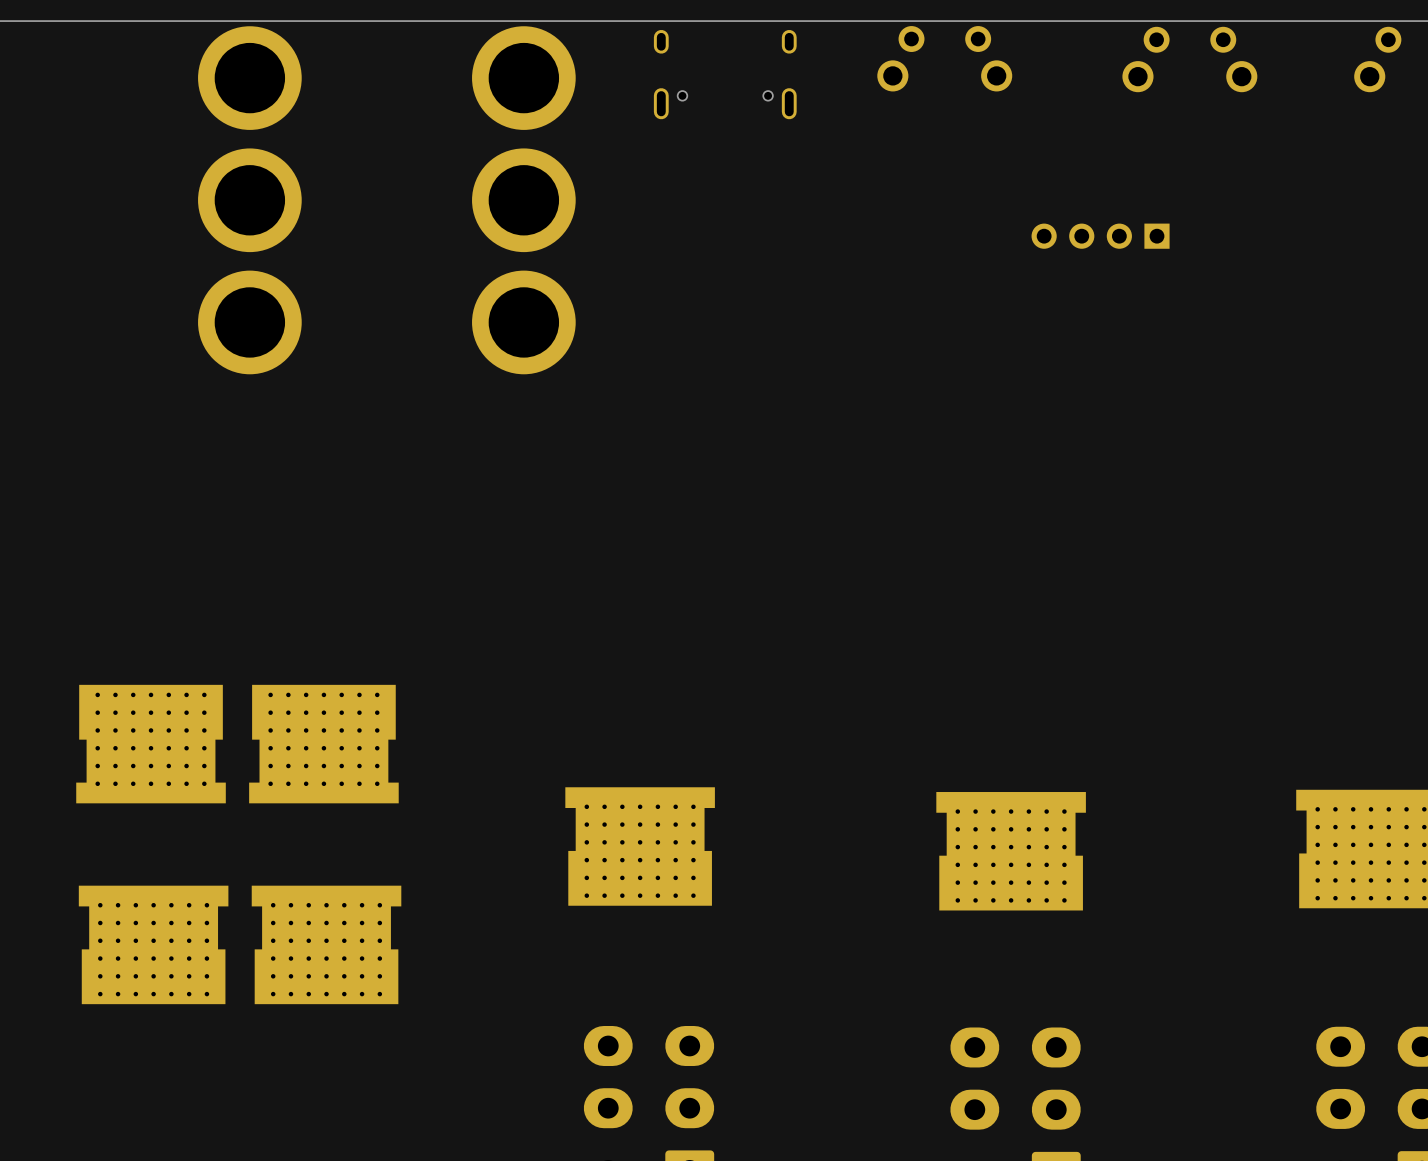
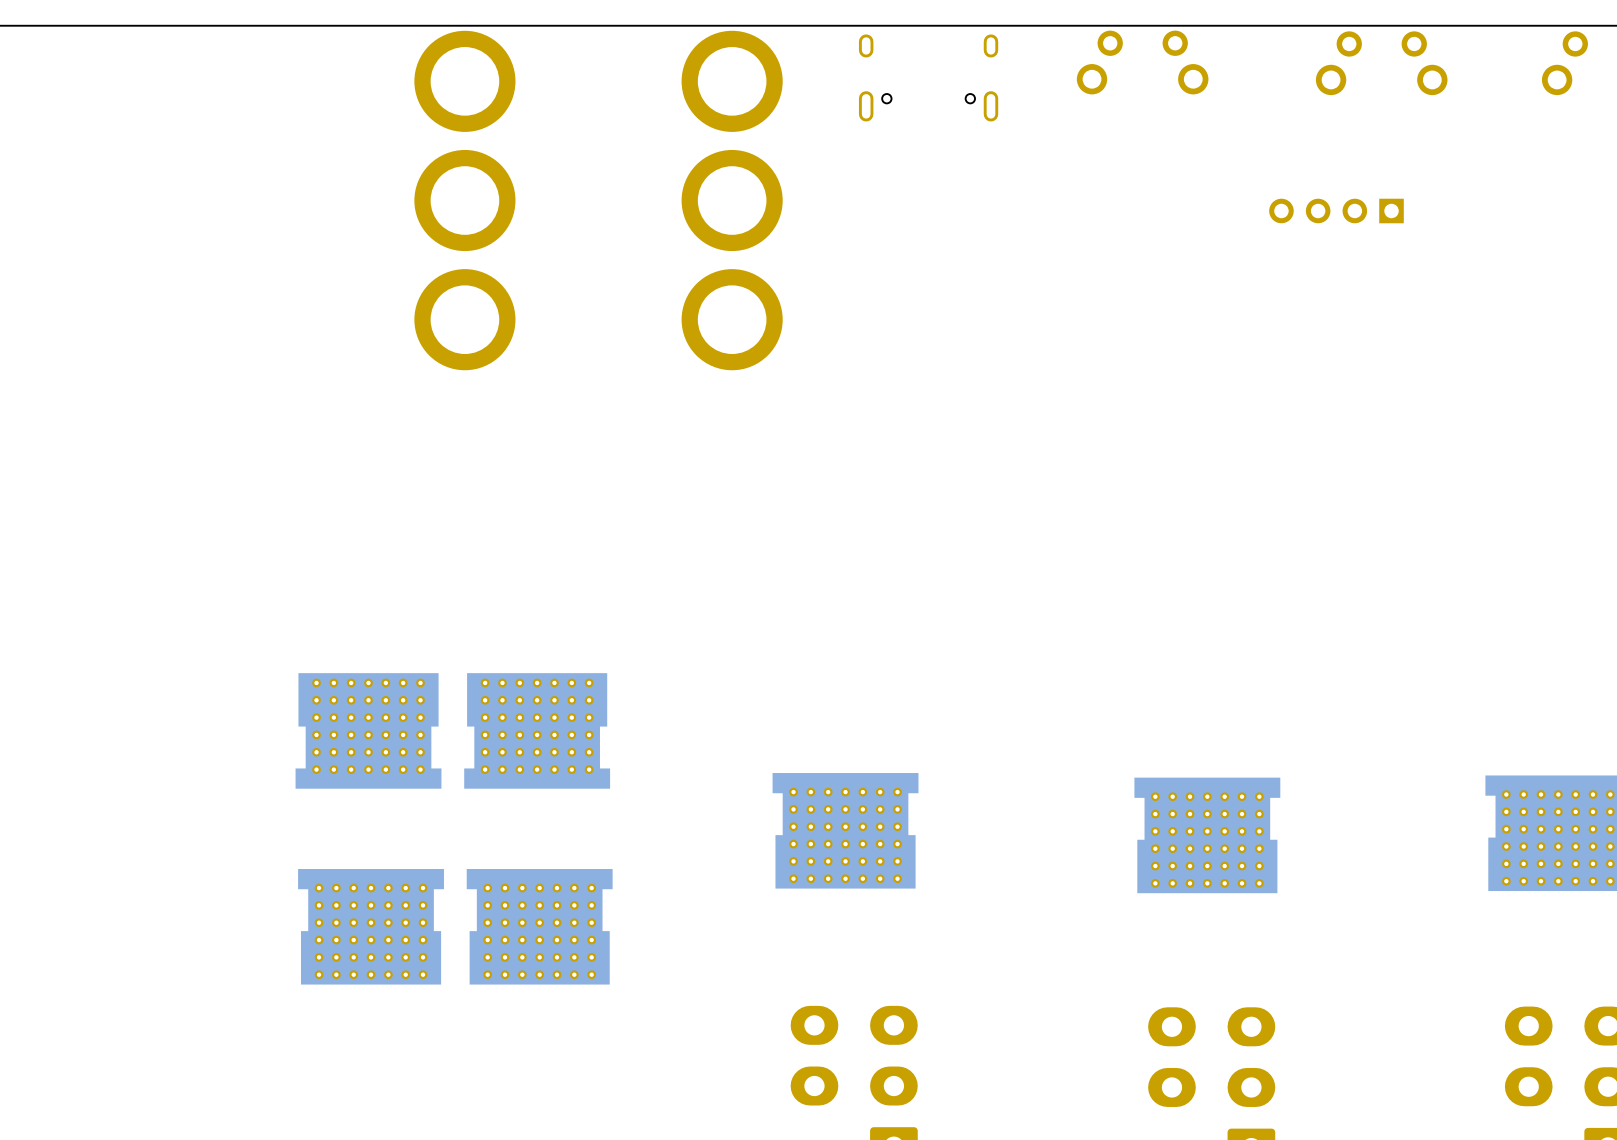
part position: (1100, 236) -> (1336, 210)

